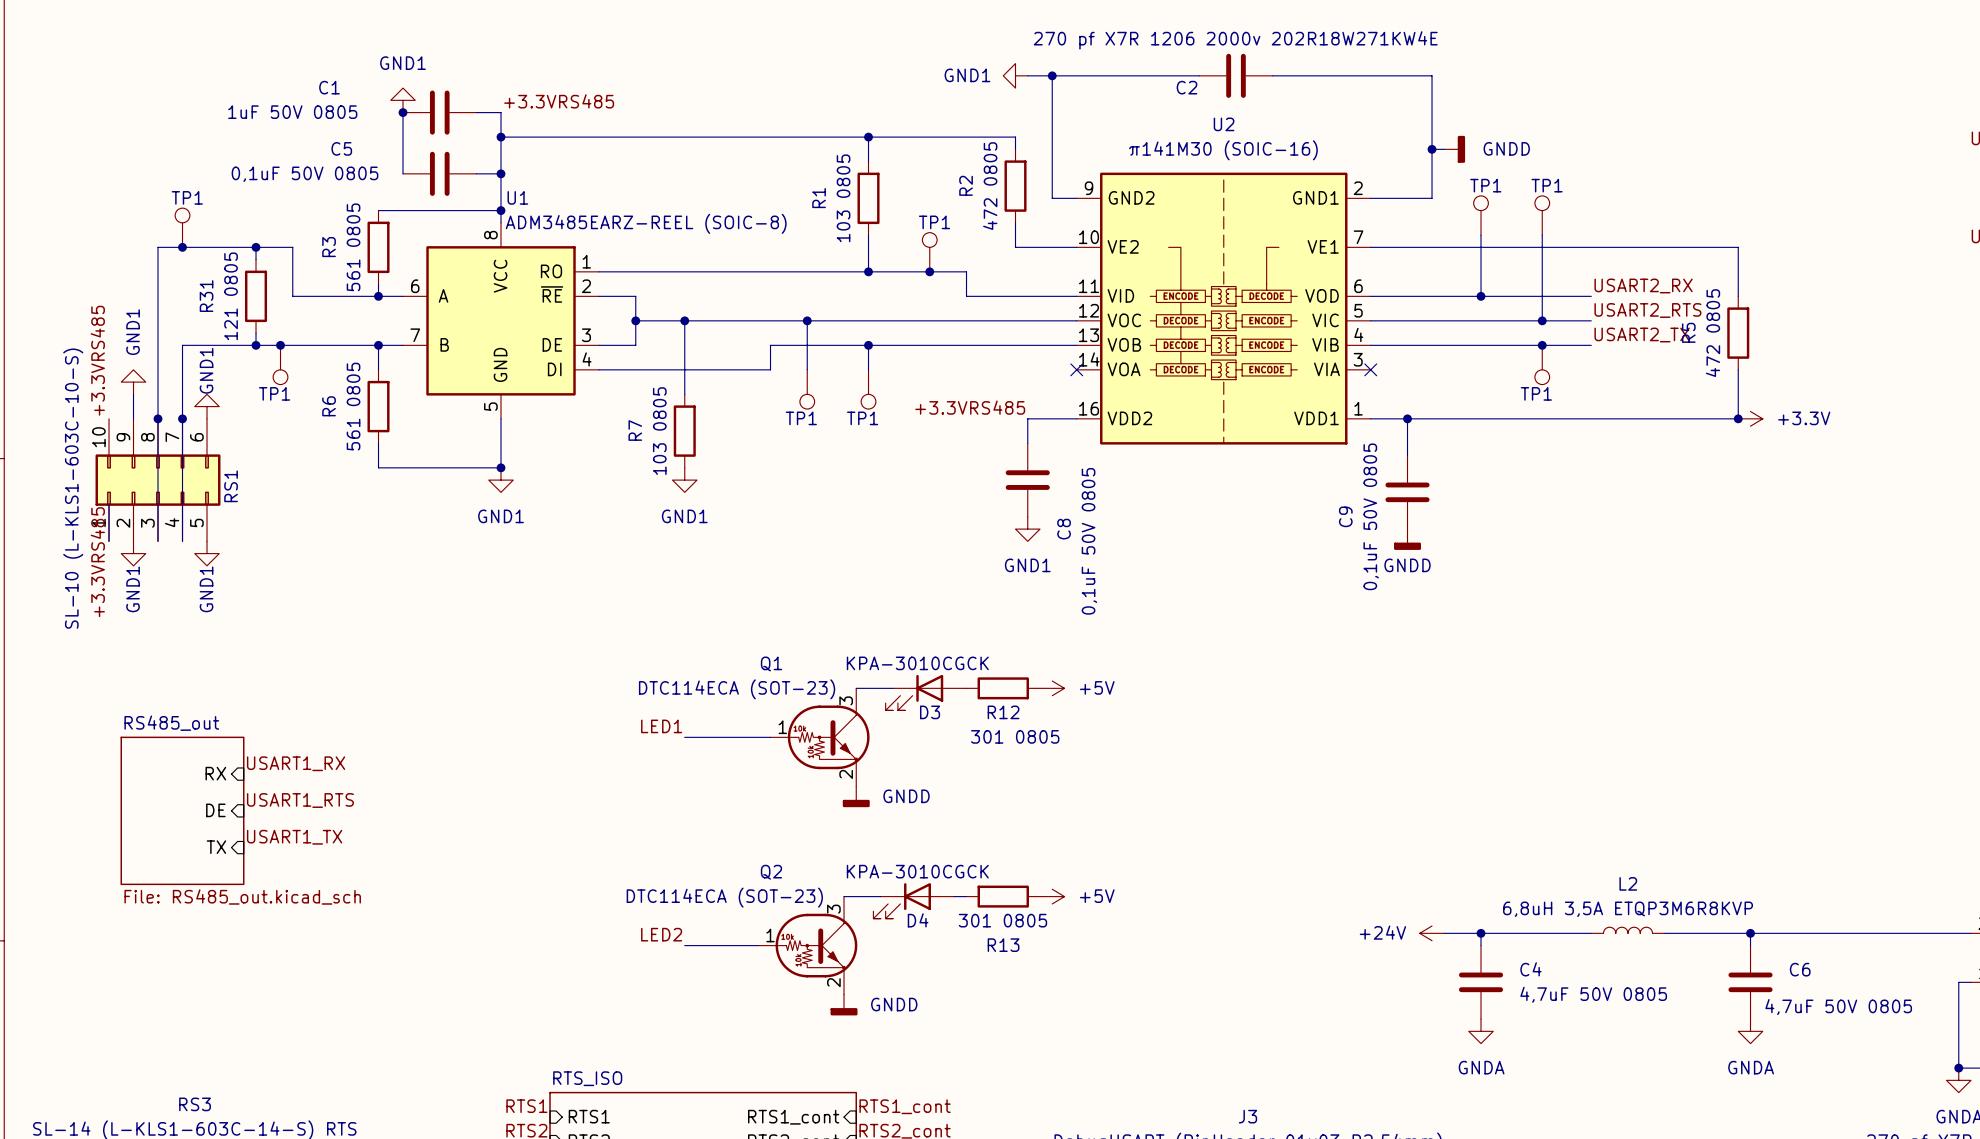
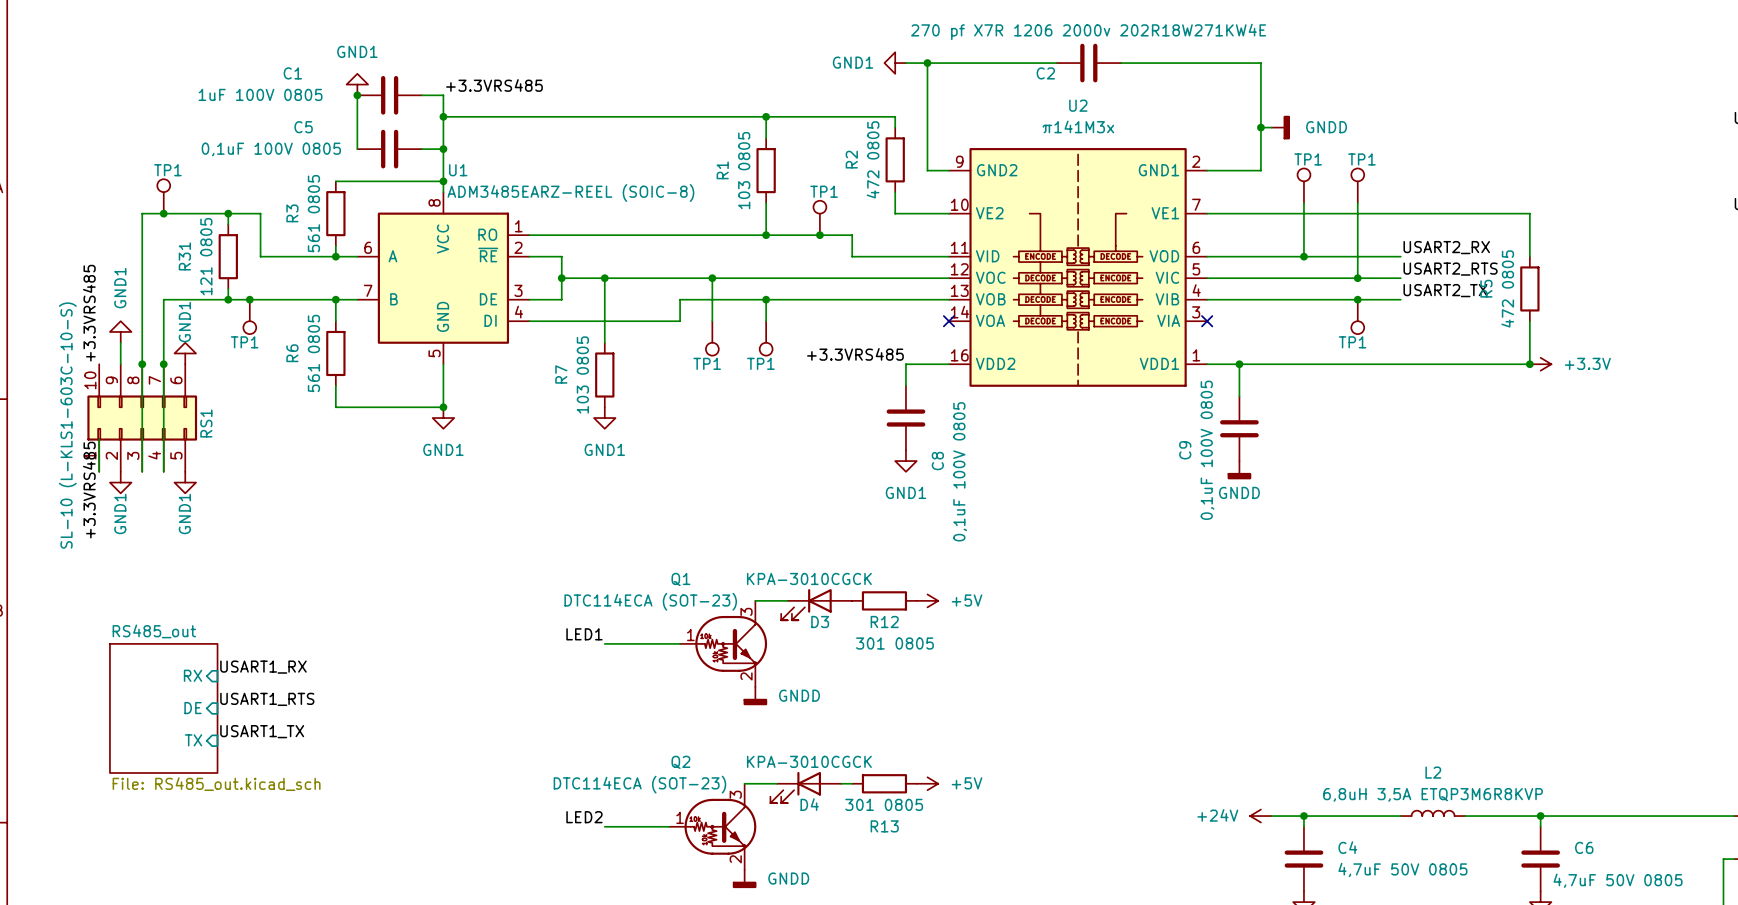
C1 value: 1uF 50V 0805 (292, 112) -> 1uF 100V 0805 (260, 94)
U2 value: π141M30 (SOIC-16) (1223, 150) -> π141M3x (1078, 126)
C5 value: 0,1uF 50V 0805 (305, 174) -> 0,1uF 100V 0805 (271, 149)
C9 value: 0,1uF 50V 0805 (1371, 516) -> 0,1uF 100V 0805 (1207, 450)
C8 value: 0,1uF 50V 0805 (1089, 541) -> 0,1uF 100V 0805 (960, 471)

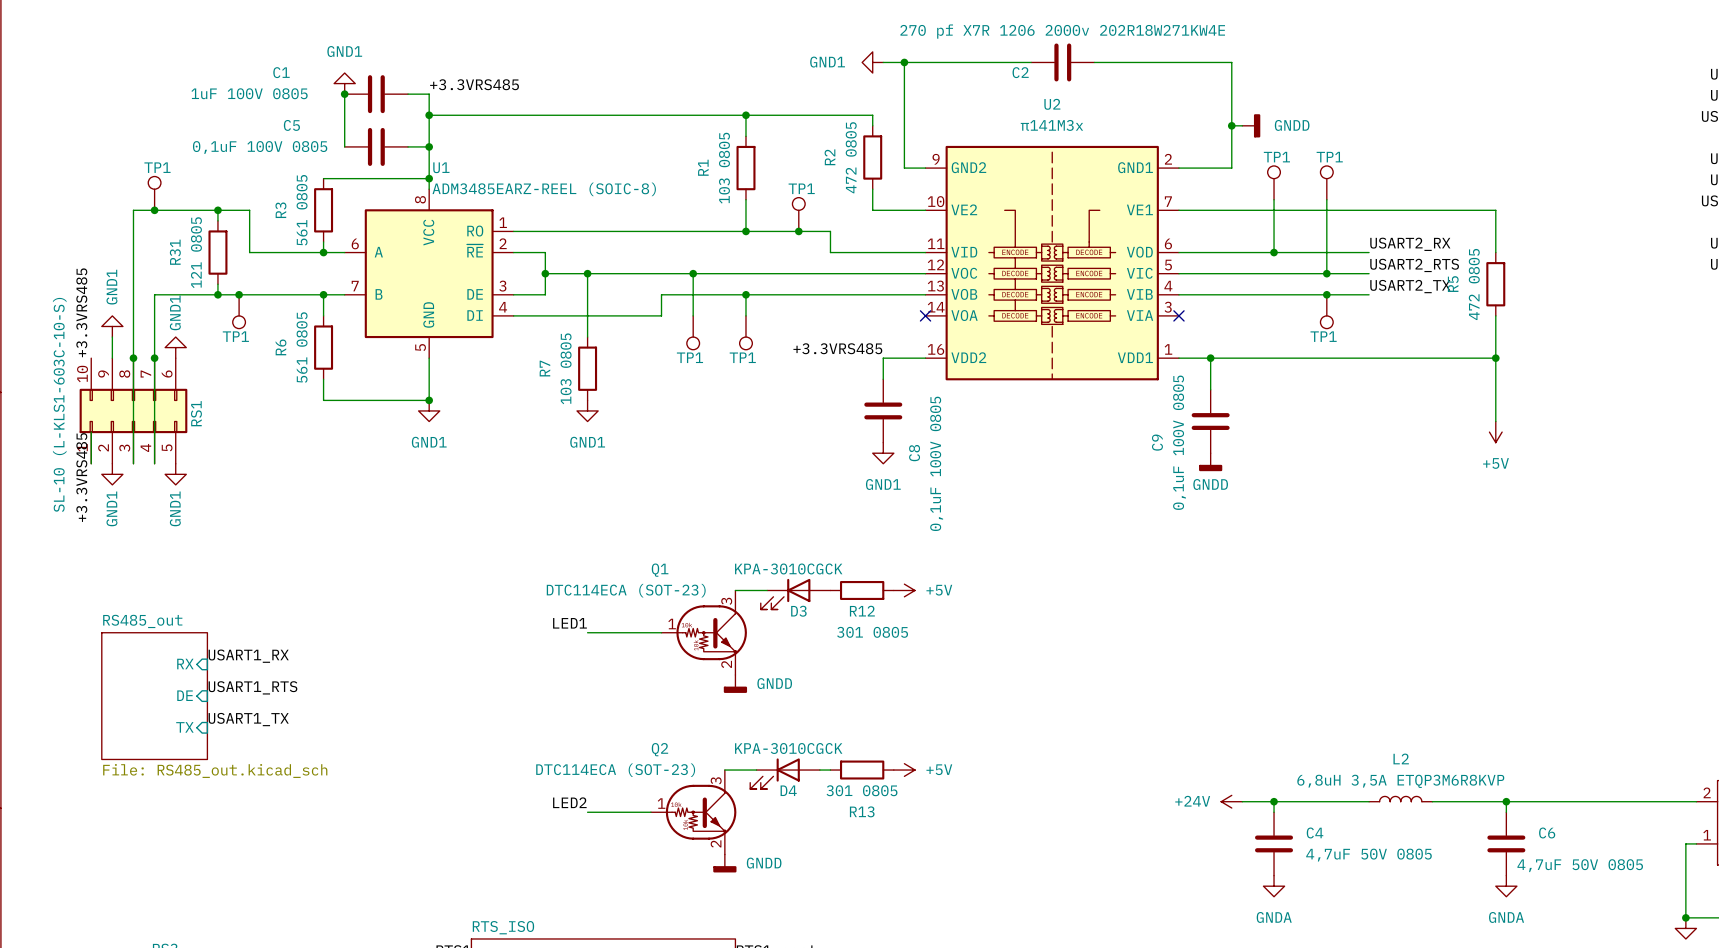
wire: none -> (1495, 358) (1495, 421)
power symbol: +3.3V (1540, 364) -> none
power symbol: none -> +5V (1495, 432)

